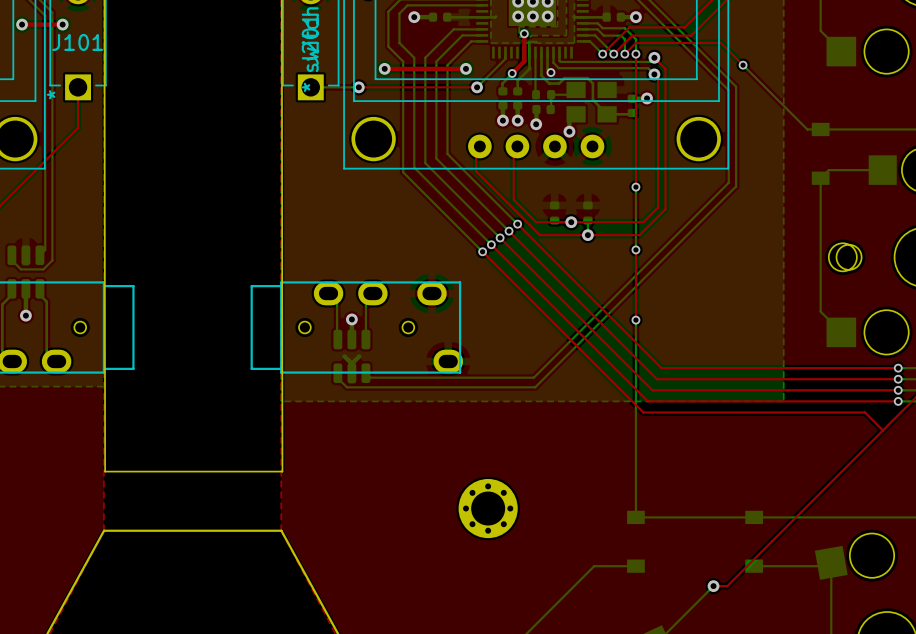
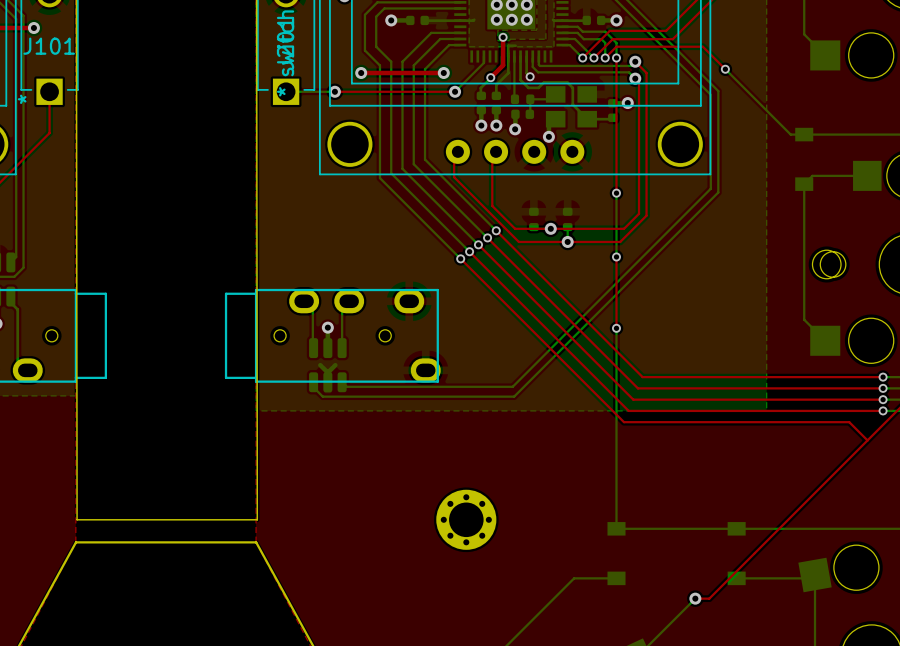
board edge: (105, 471) (282, 471) -> (77, 482) (77, 519) (257, 519) (257, 482)

